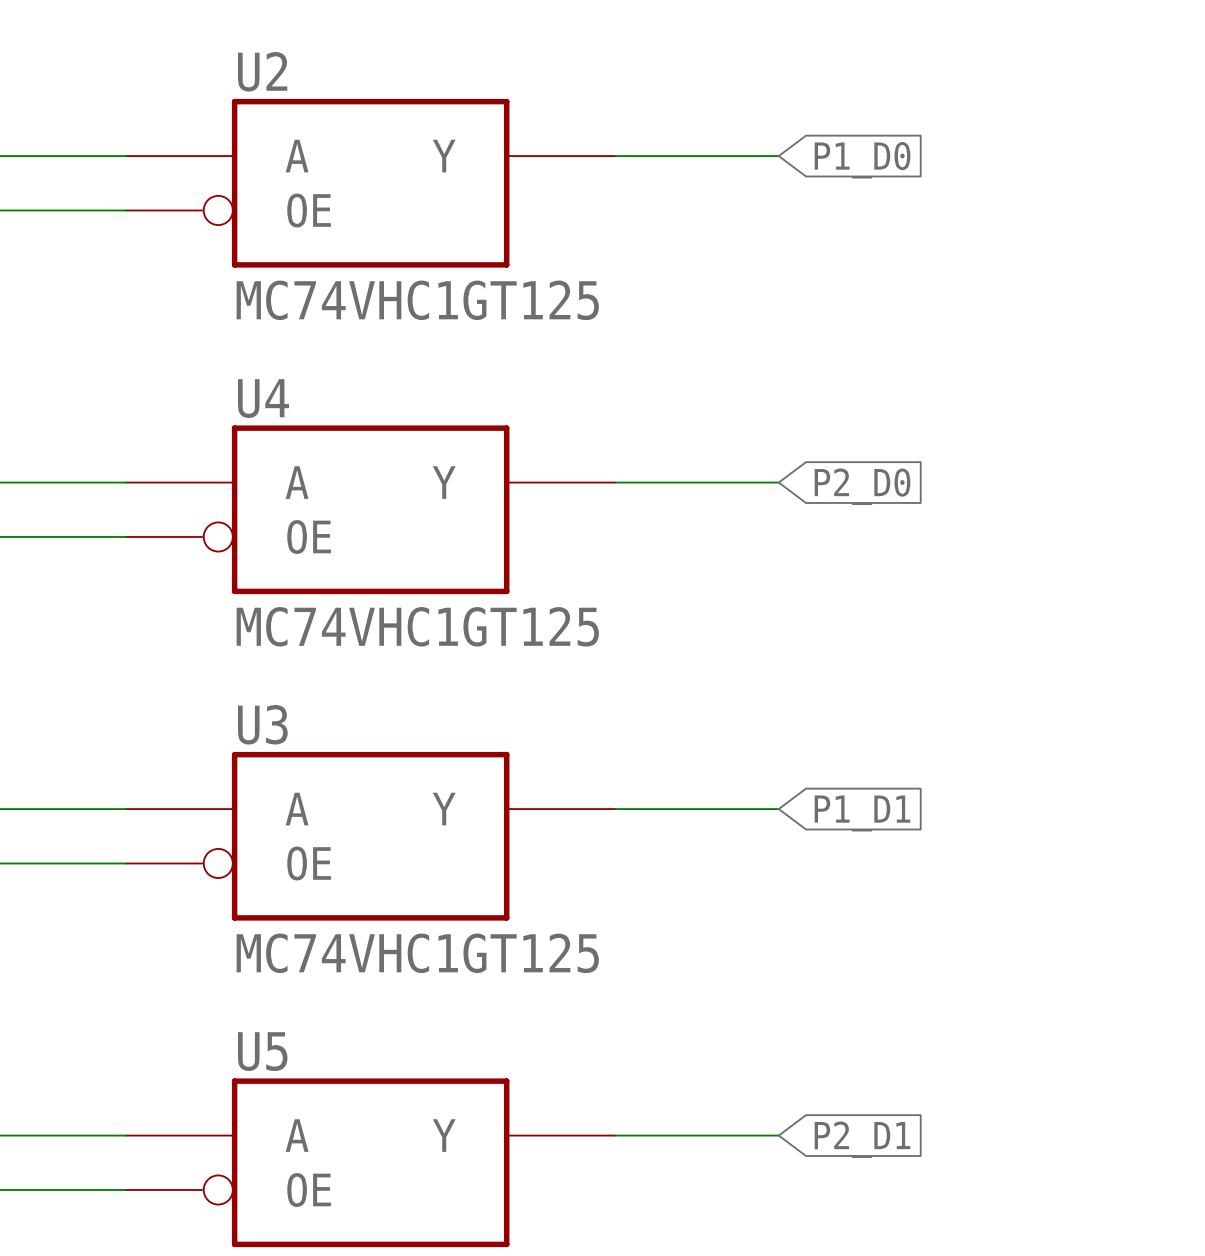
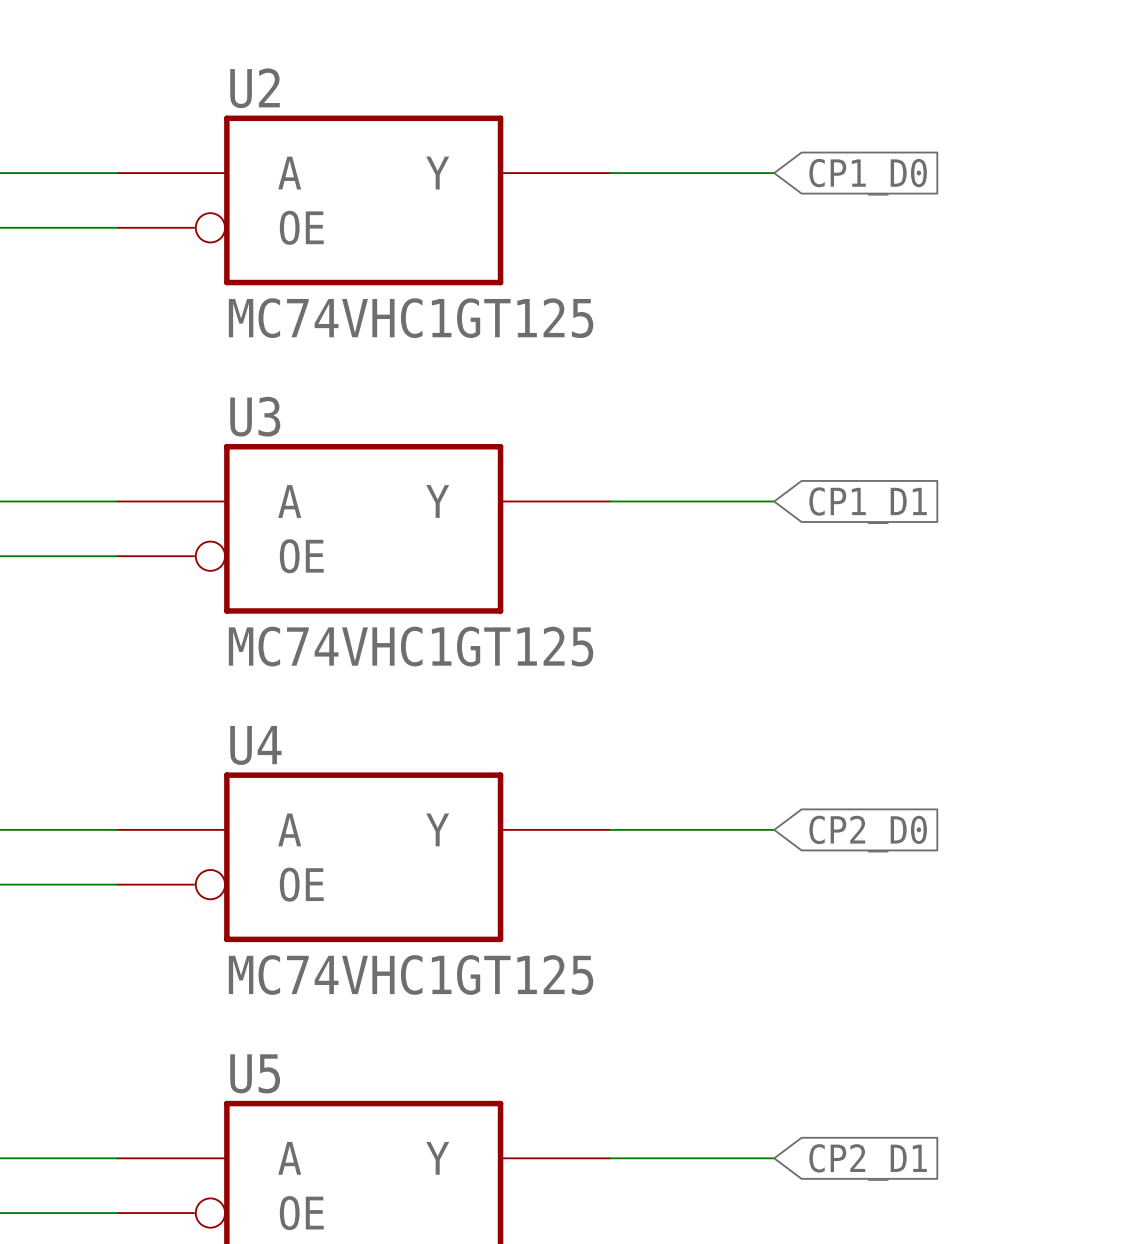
global label: P1_D0 (862, 160) -> CP1_D0 (868, 177)
U4 name: U4 (263, 398) -> U3 (255, 416)
global label: P2_D0 (862, 486) -> CP1_D1 (868, 505)
U3 name: U3 (262, 724) -> U4 (255, 745)
global label: P1_D1 (862, 813) -> CP2_D0 (868, 834)
global label: P2_D1 (862, 1139) -> CP2_D1 (868, 1162)

